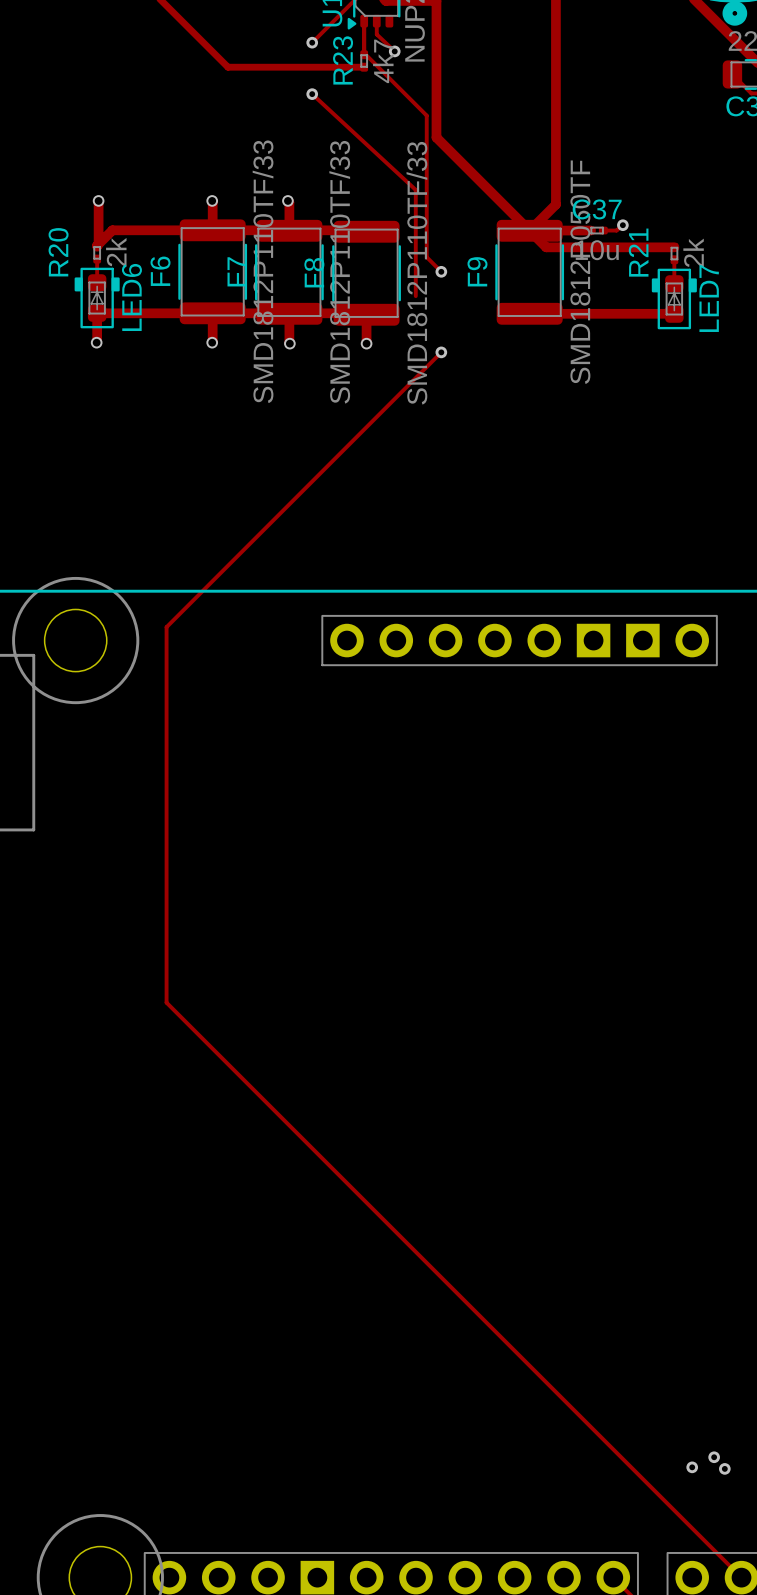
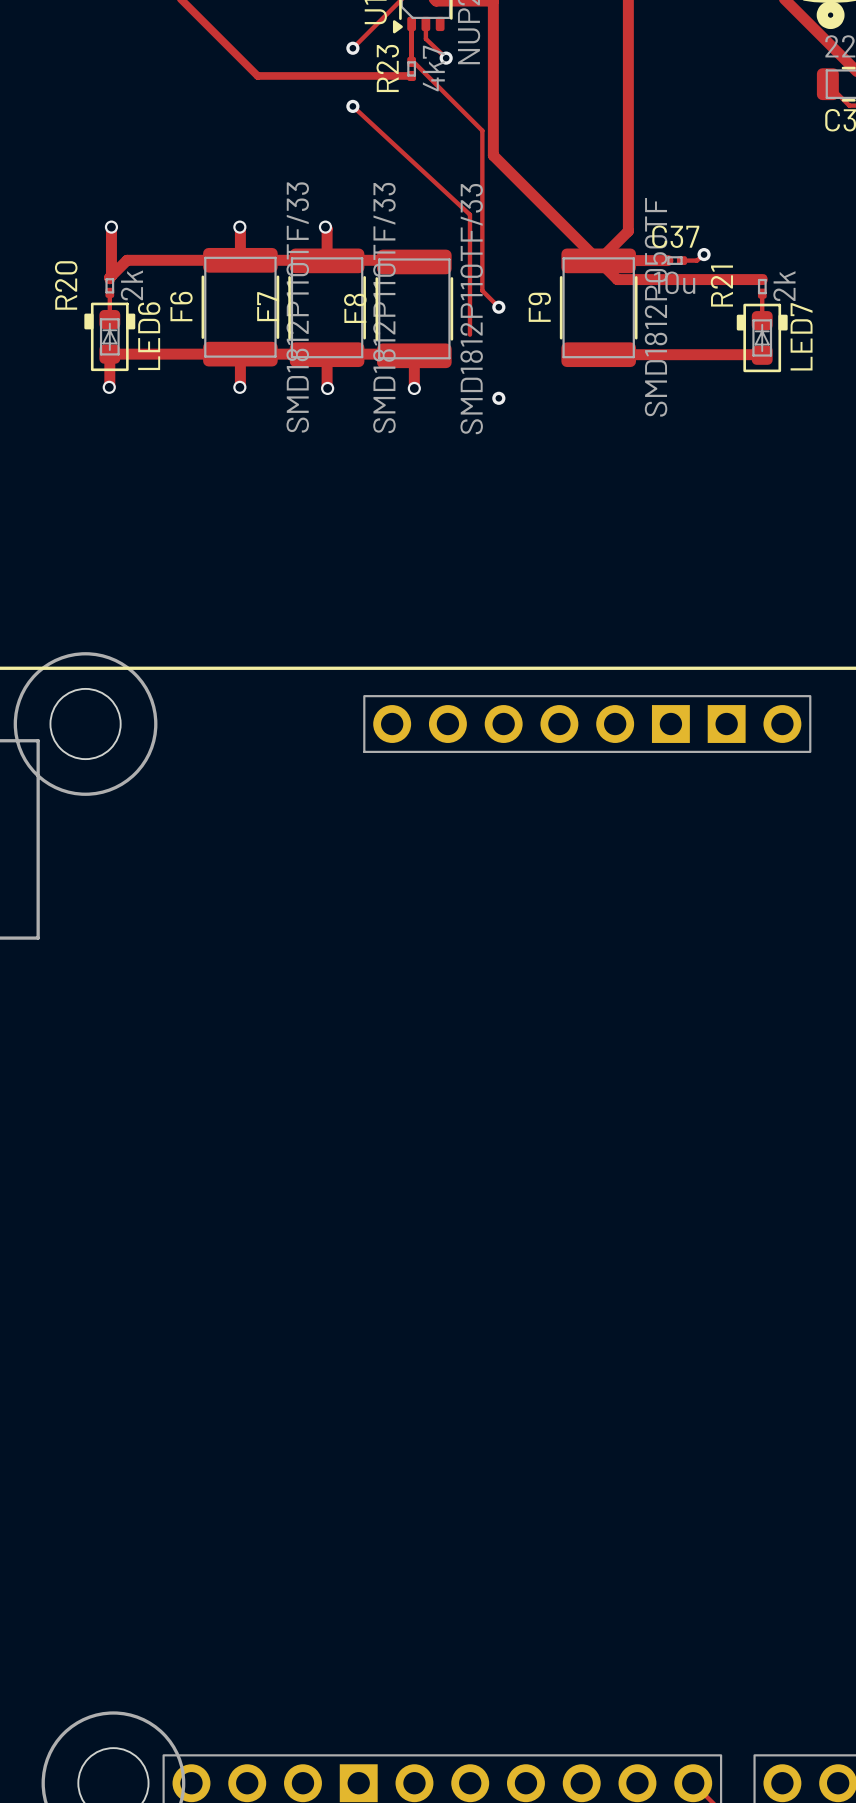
track: (441, 352) (166, 627) (166, 1002) (741, 1577) -> none
via: (714, 1457) -> none
via: (692, 1467) -> none
via: (724, 1468) -> none

